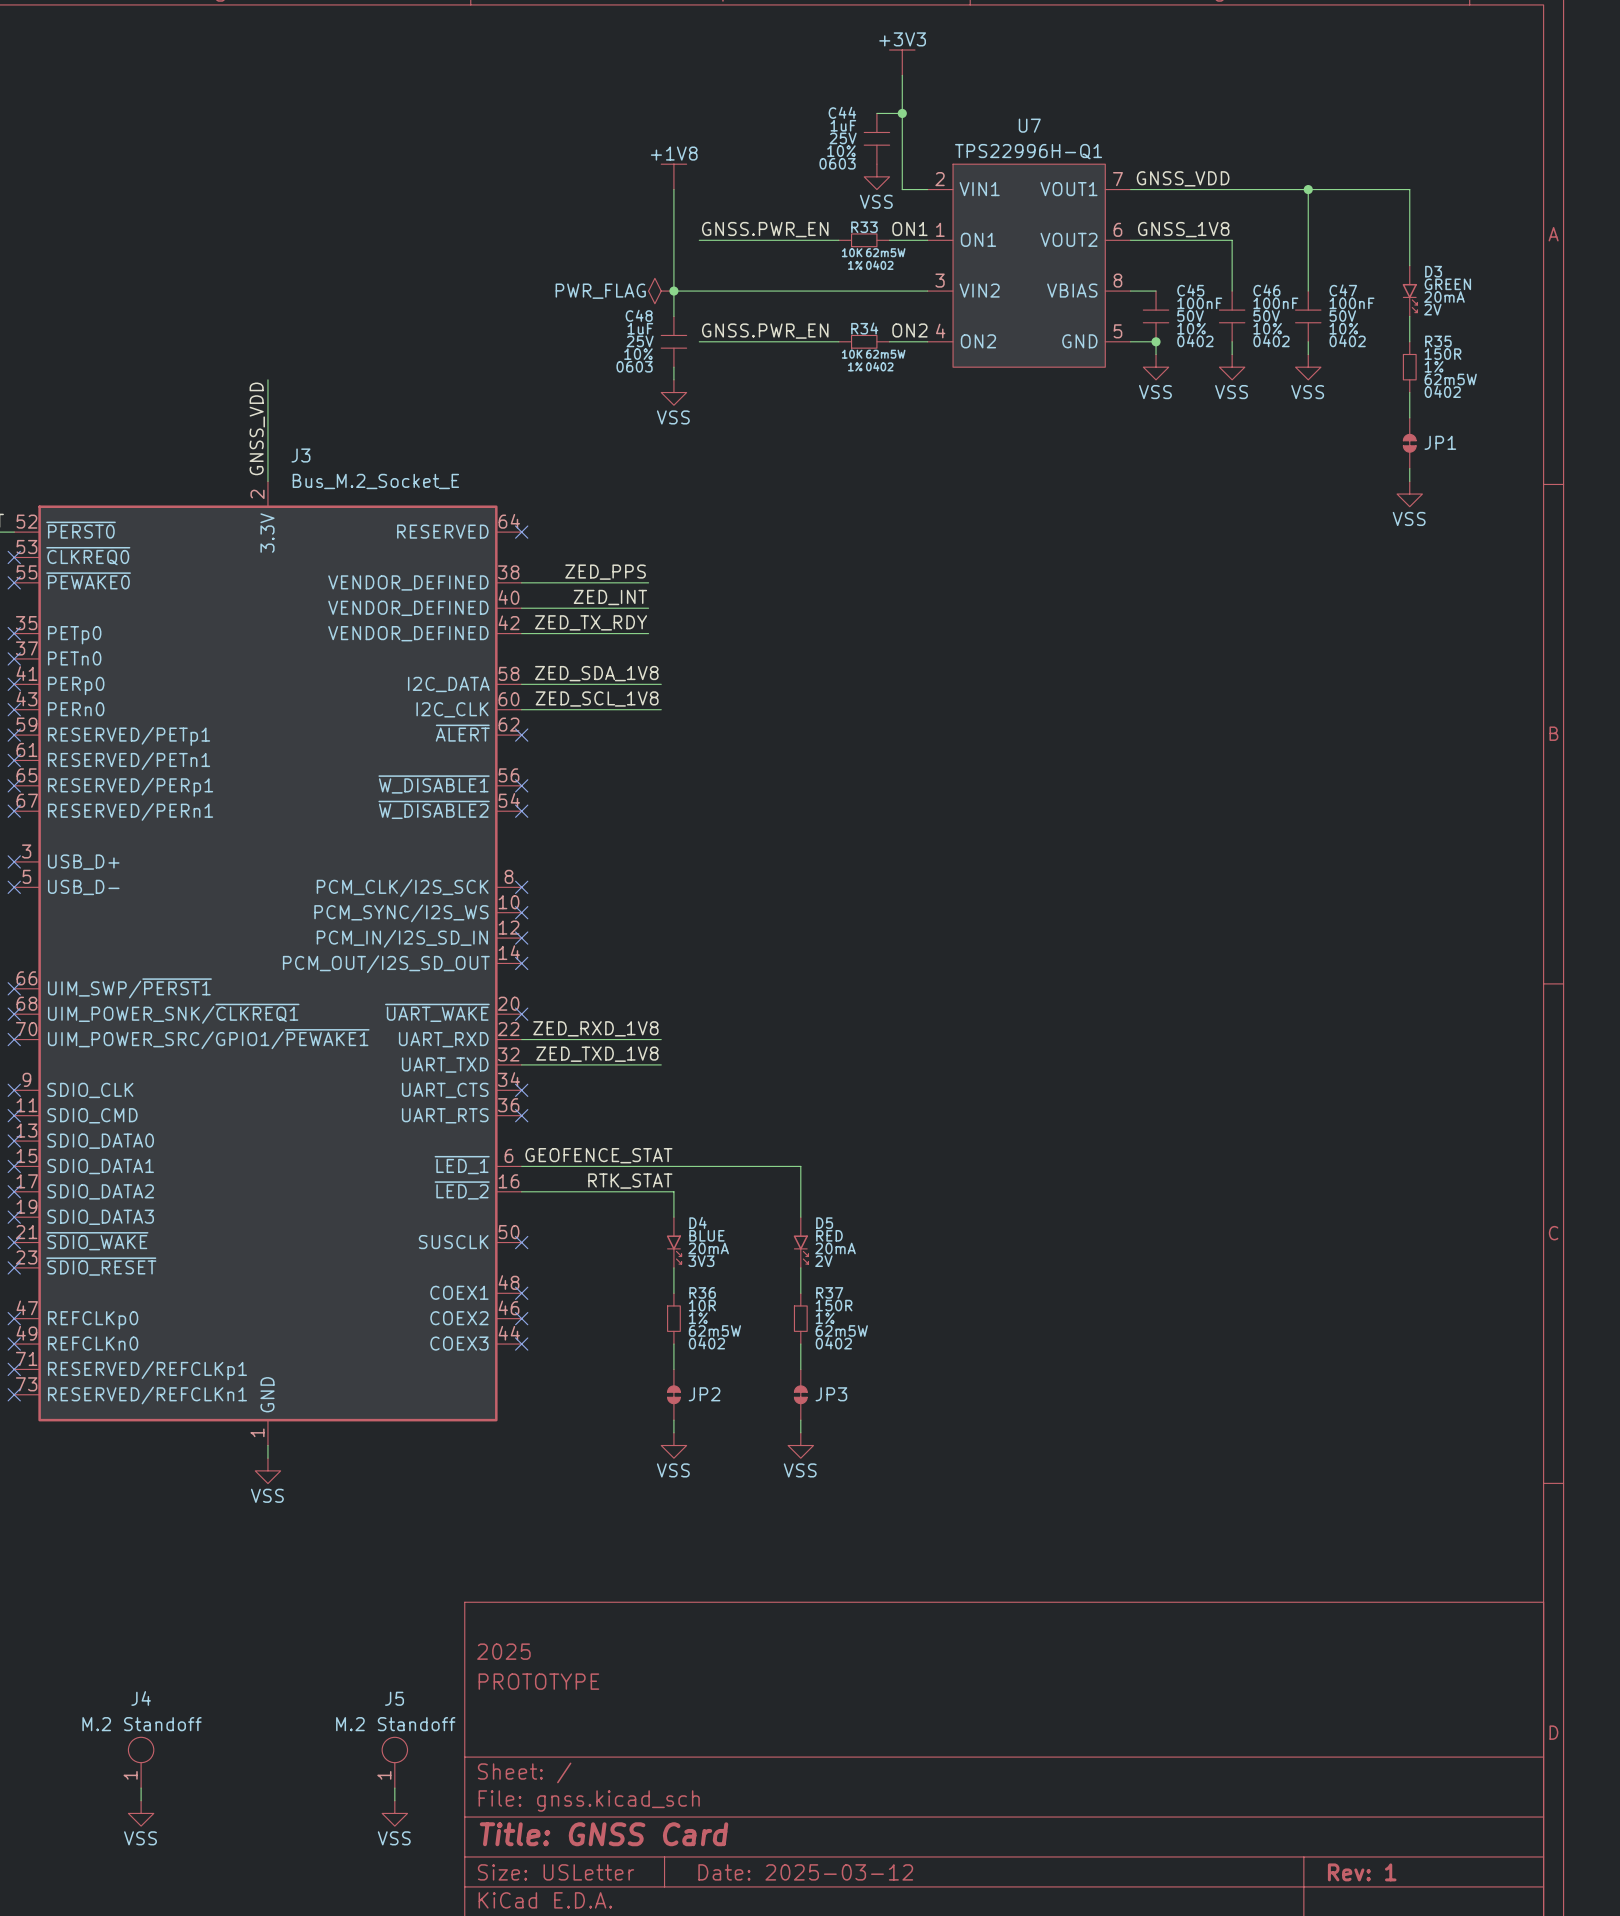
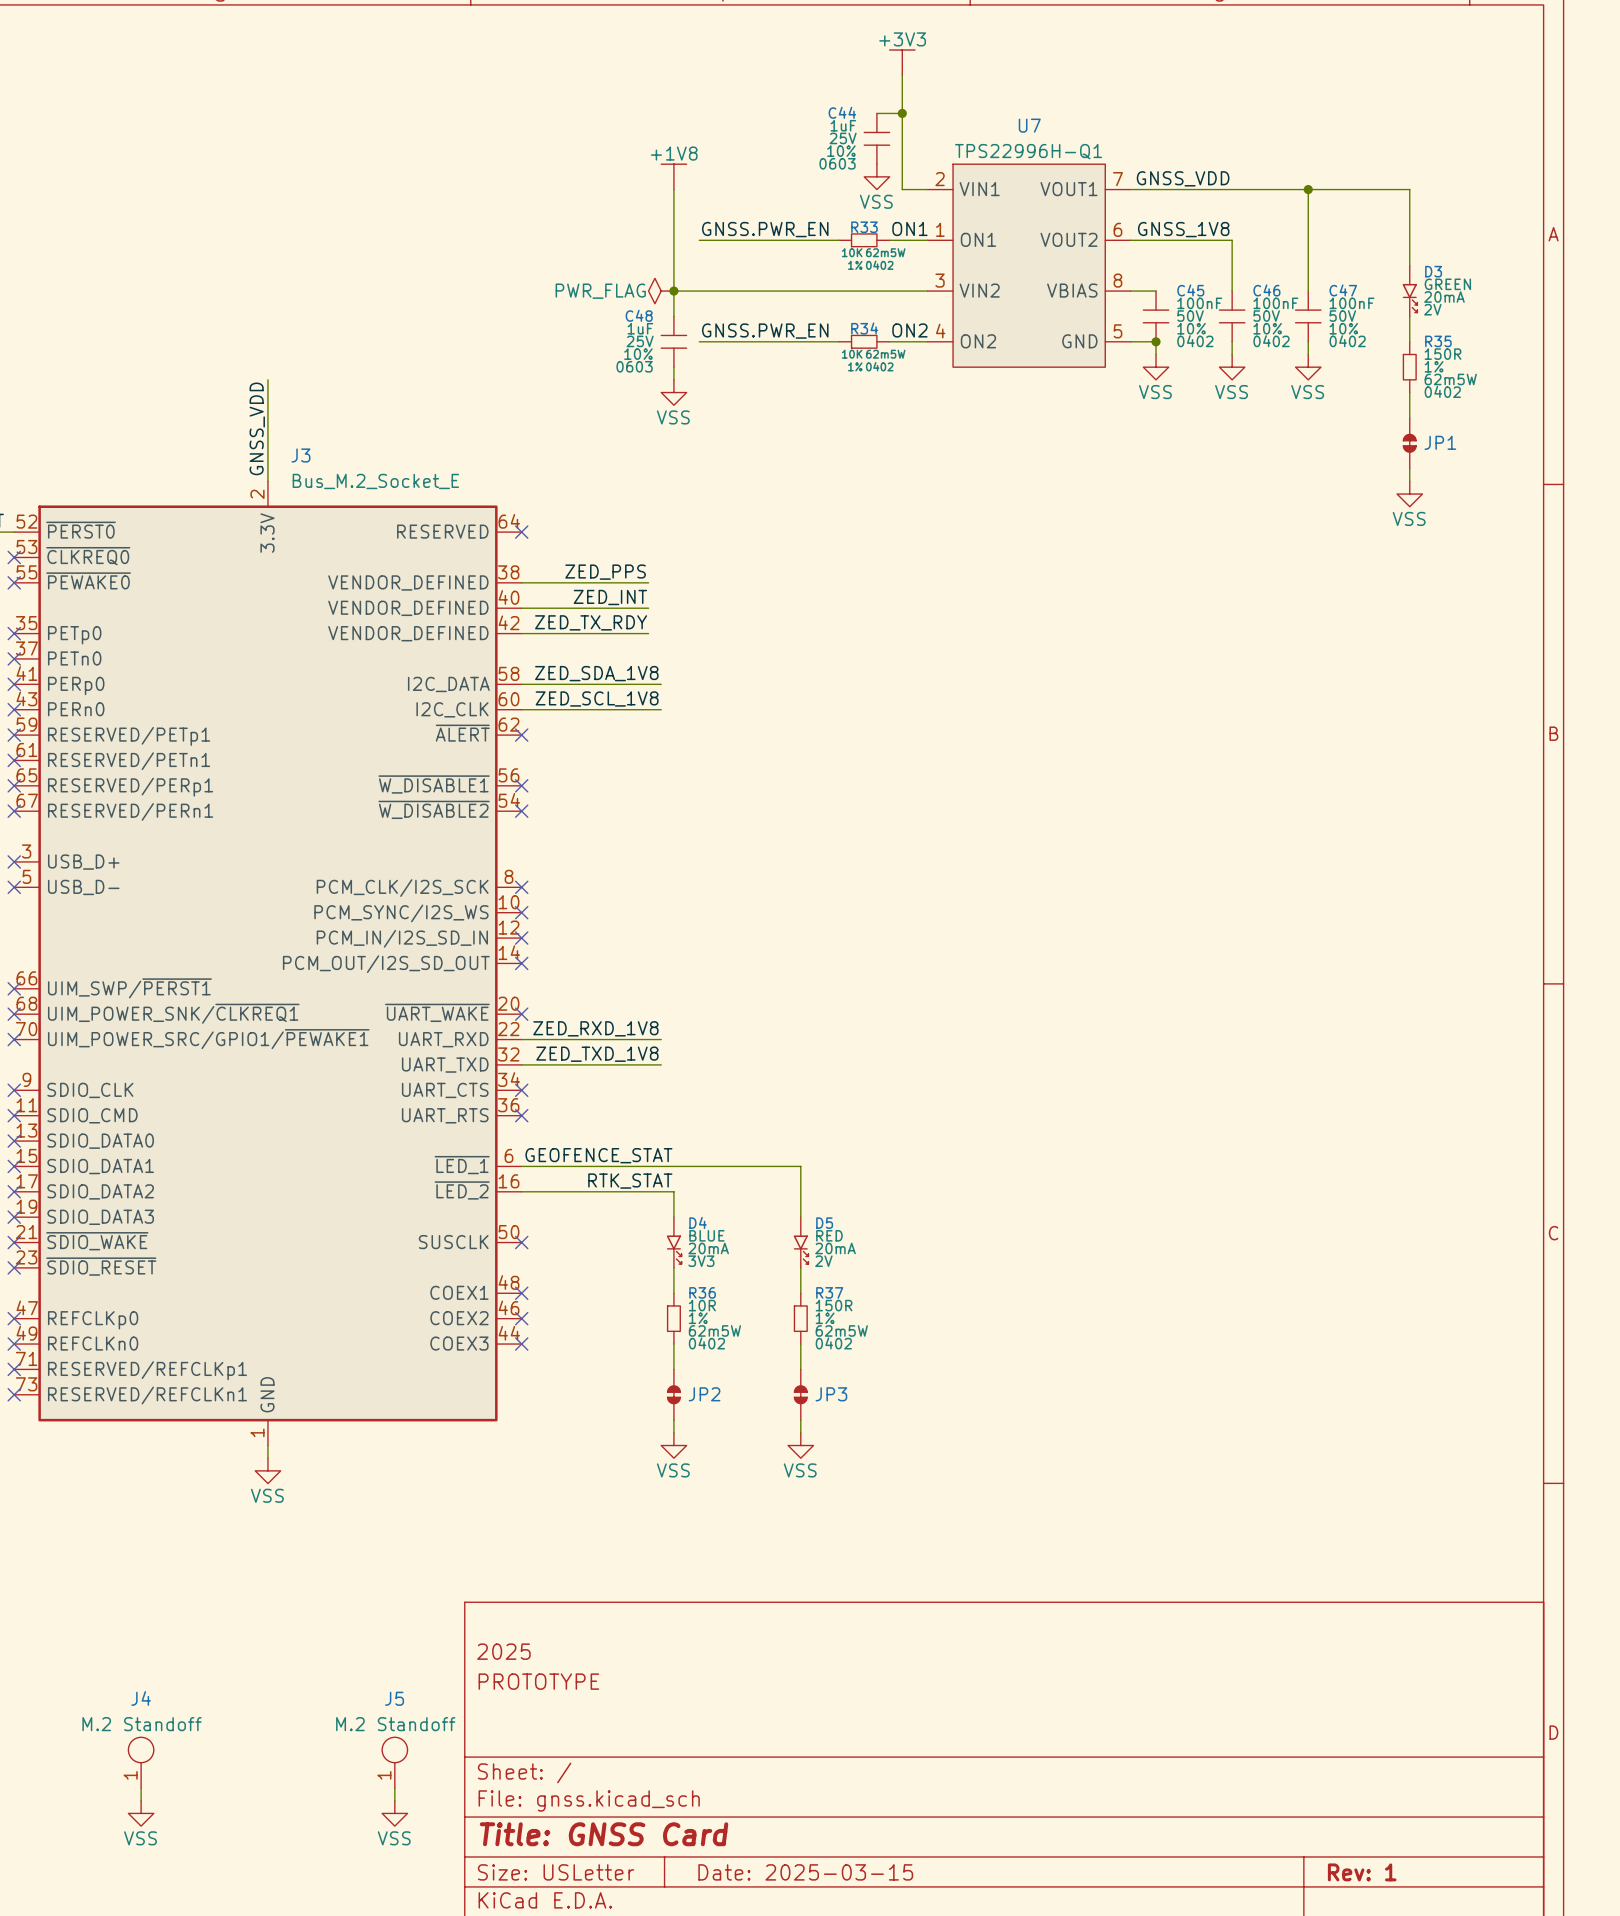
title block: Date: 2025-03-12 (805, 1872) -> Date: 2025-03-15 (805, 1872)

